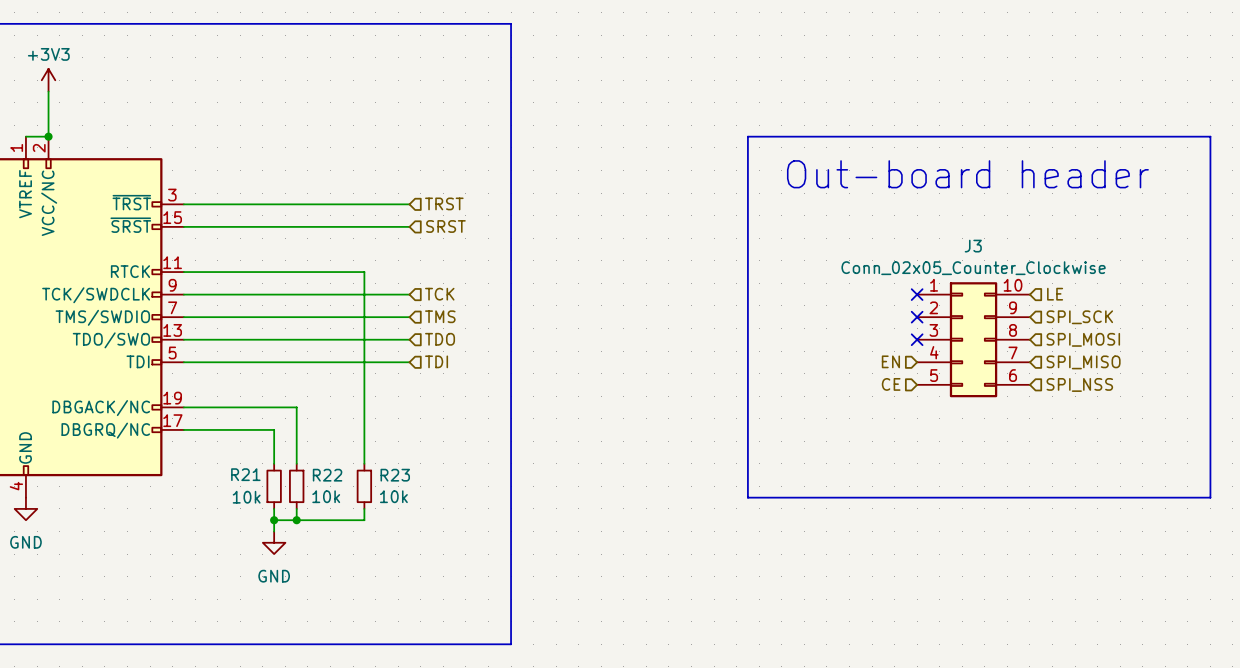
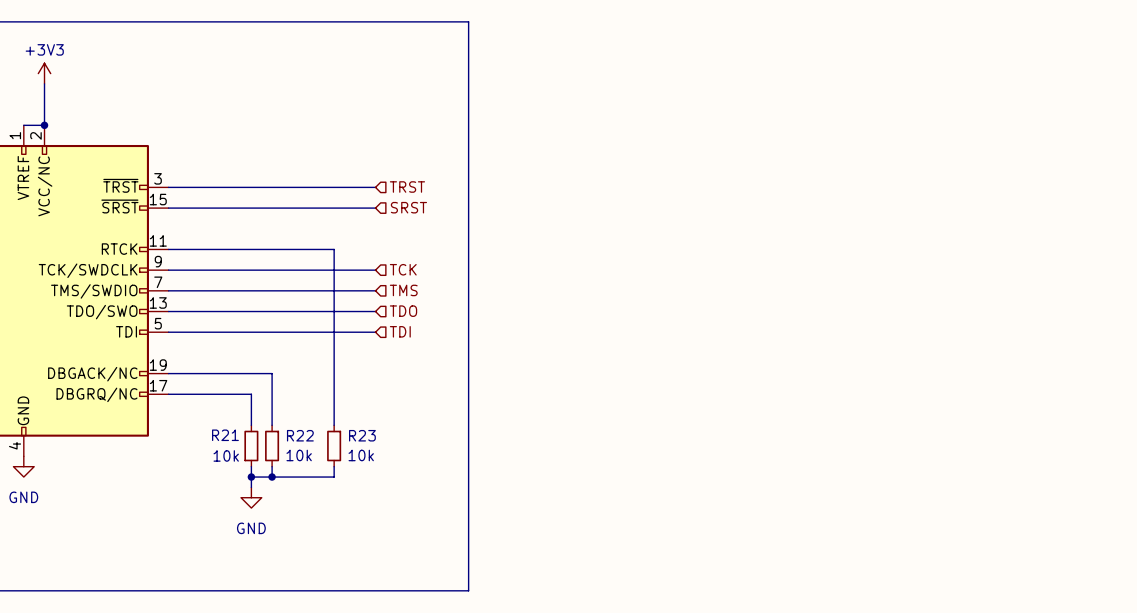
line: (747, 136) (1210, 136) (1210, 497) (747, 497) (747, 136) -> none
text: Out-board header (967, 174) -> none
no-connect mark: (917, 294) -> none
hierarchical label: LE (1055, 294) -> none
no-connect mark: (917, 317) -> none
hierarchical label: SPI_SCK (1079, 317) -> none
no-connect mark: (917, 339) -> none
J3: Conn_02x05_Counter_Clockwise (973, 339) -> none
hierarchical label: SPI_MOSI (1083, 339) -> none
hierarchical label: EN (890, 361) -> none
hierarchical label: SPI_MISO (1083, 362) -> none
hierarchical label: CE (891, 384) -> none
hierarchical label: SPI_NSS (1079, 384) -> none

